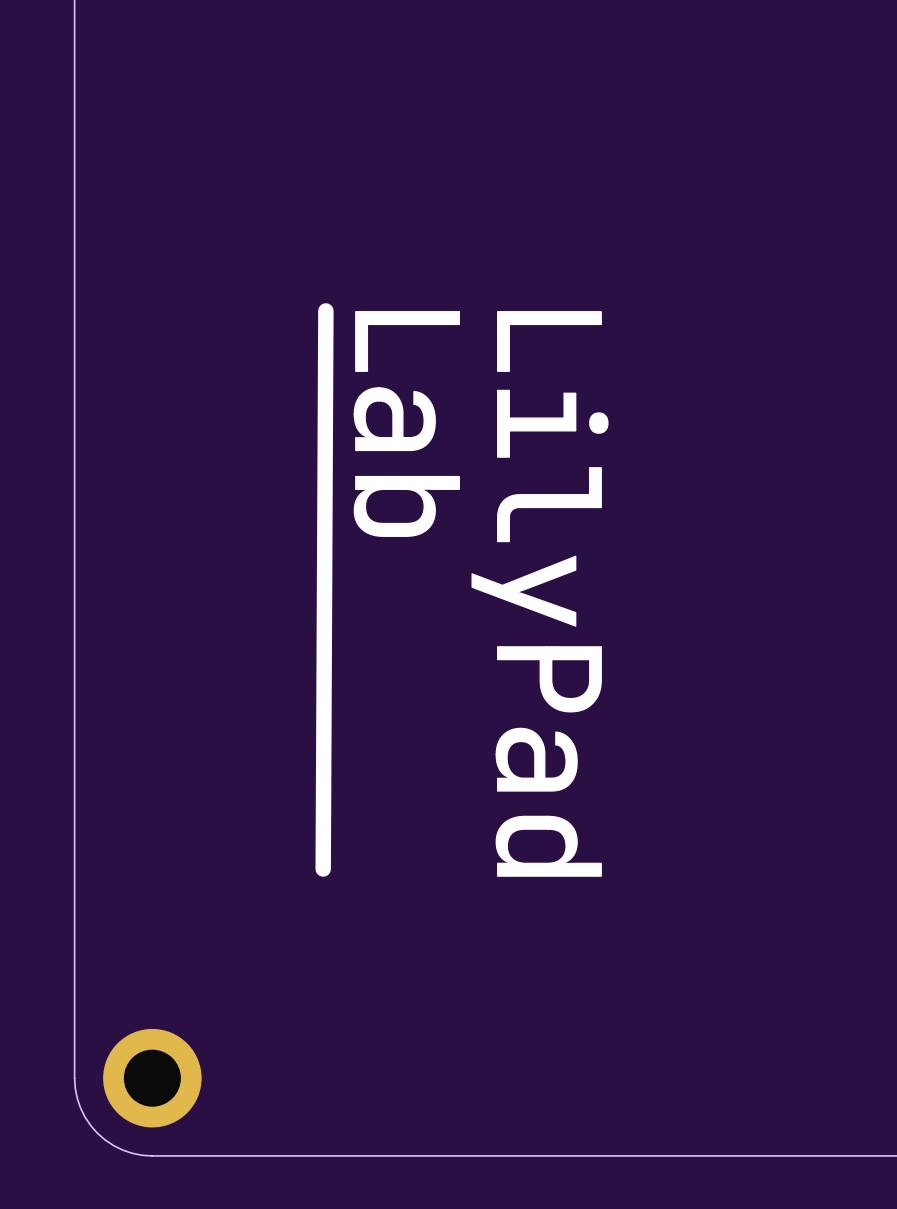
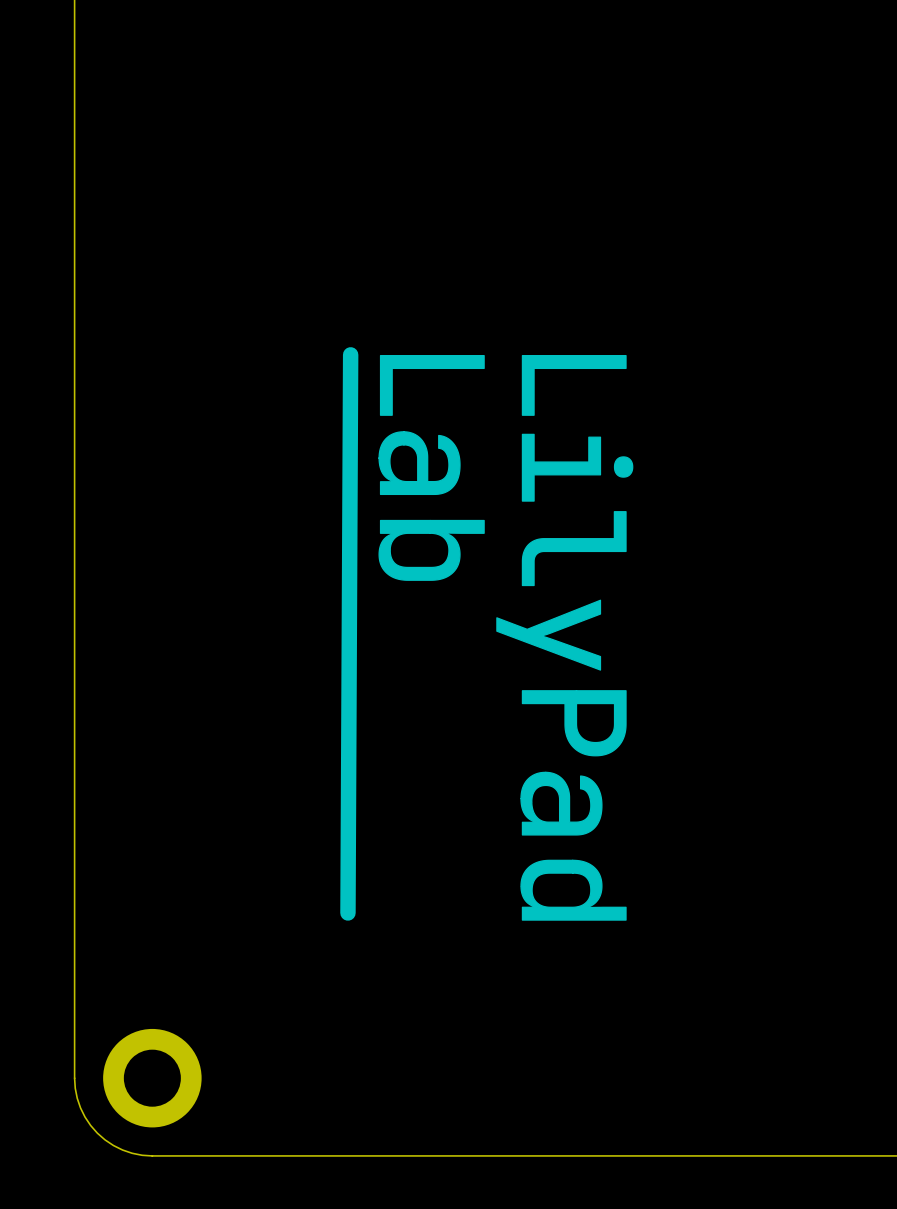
line: (325, 310) (323, 869) (325, 310) -> (350, 354) (347, 912) (350, 354)
drawing position: (407, 341) -> (432, 385)
drawing position: (549, 341) -> (574, 385)
drawing position: (394, 419) -> (419, 463)
drawing position: (536, 423) -> (561, 467)
drawing position: (598, 423) -> (623, 467)
drawing position: (549, 504) -> (574, 548)
drawing position: (406, 506) -> (431, 550)
drawing position: (523, 591) -> (548, 635)
drawing position: (549, 679) -> (574, 723)
drawing position: (536, 759) -> (561, 803)
drawing position: (548, 846) -> (573, 890)

